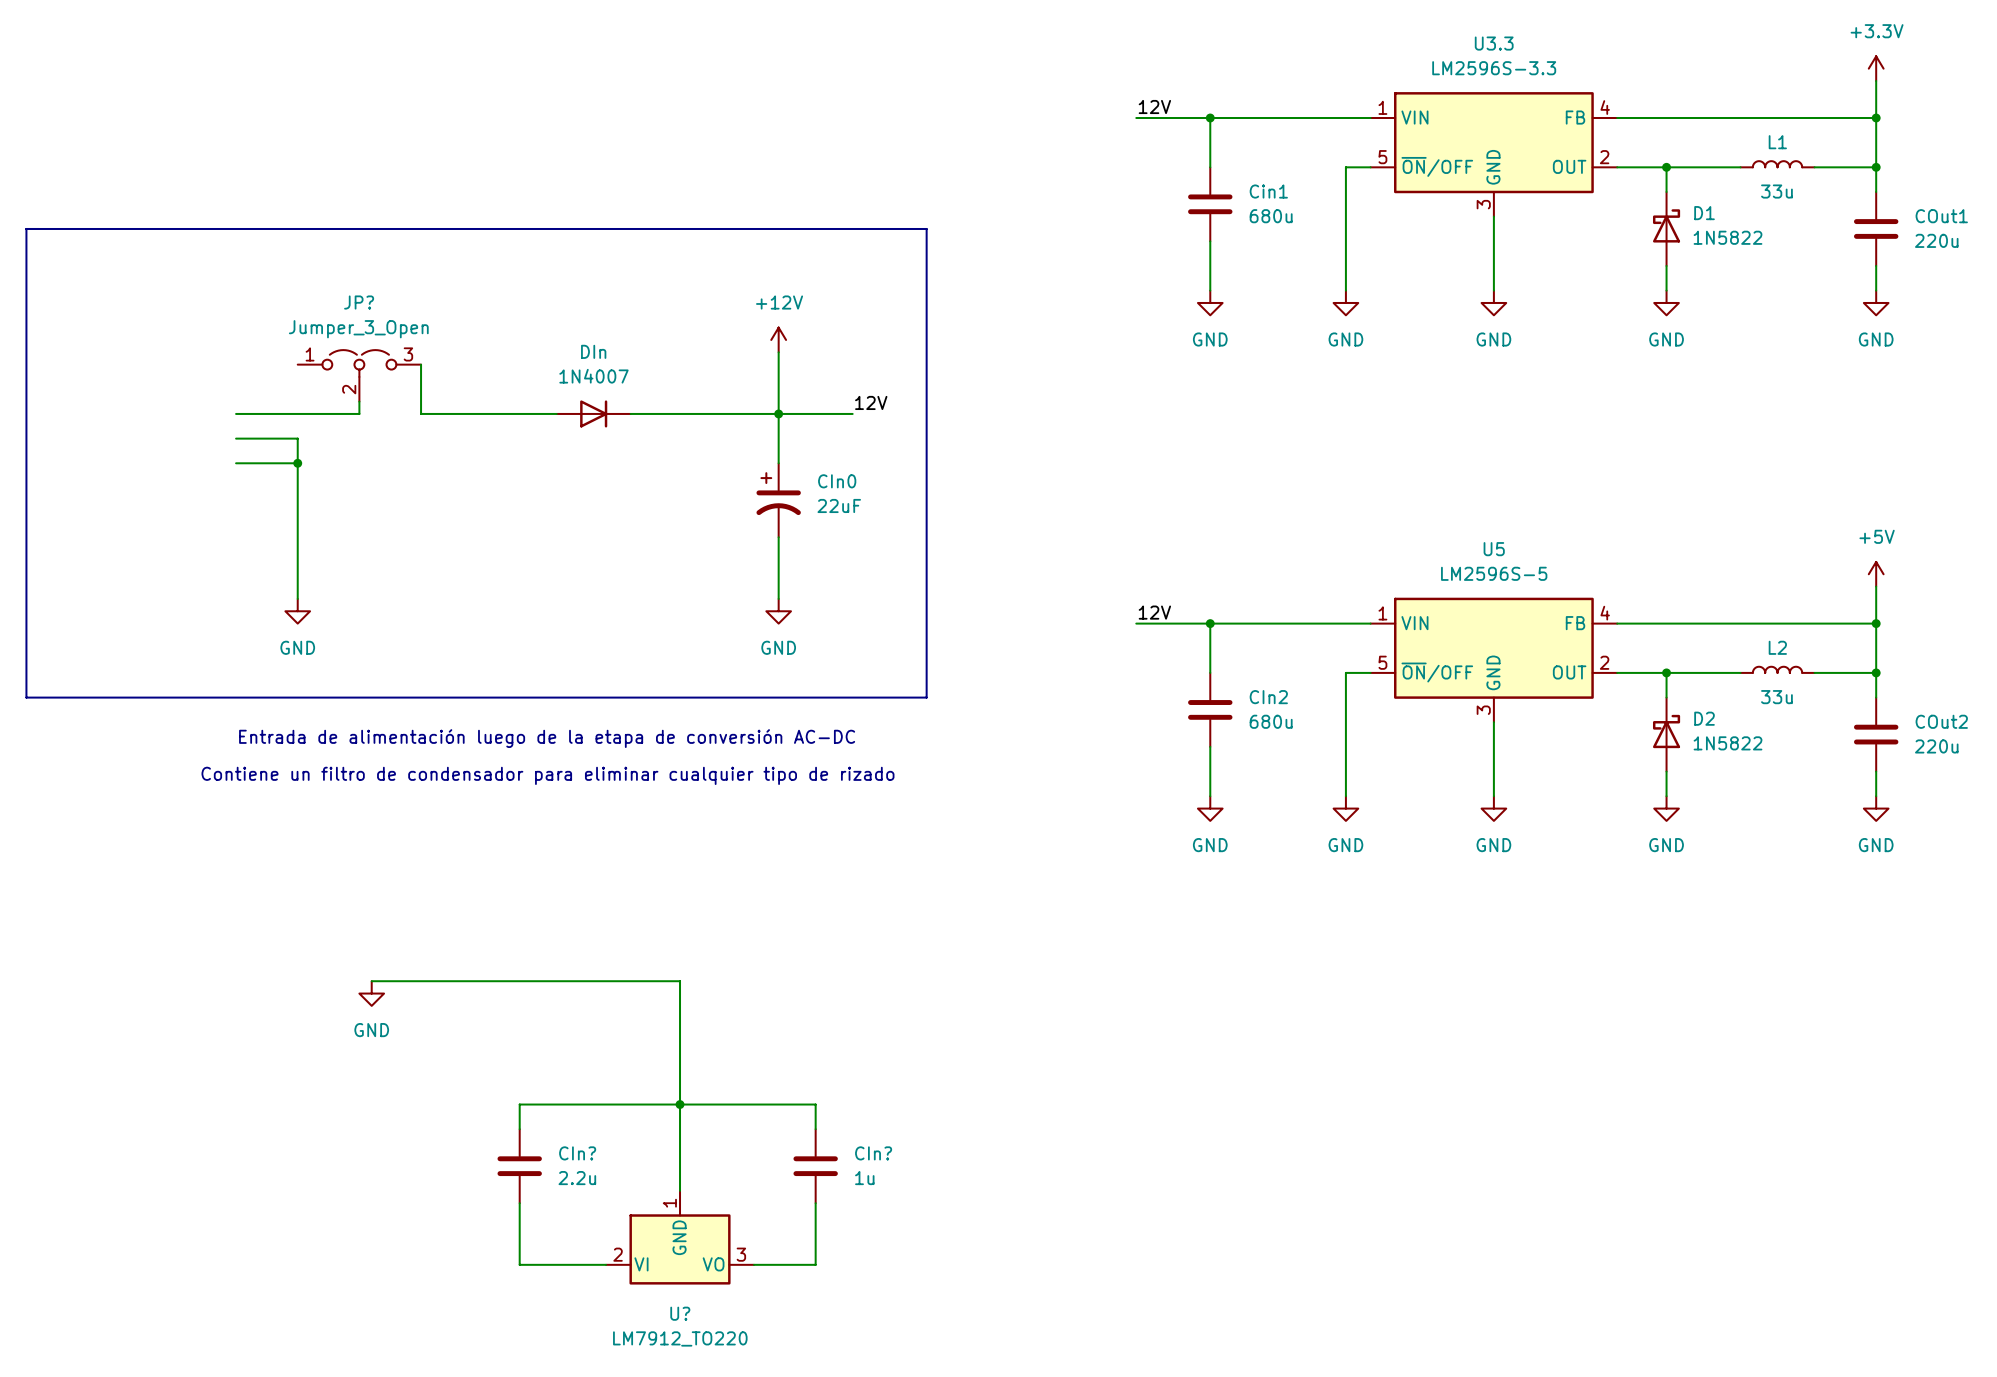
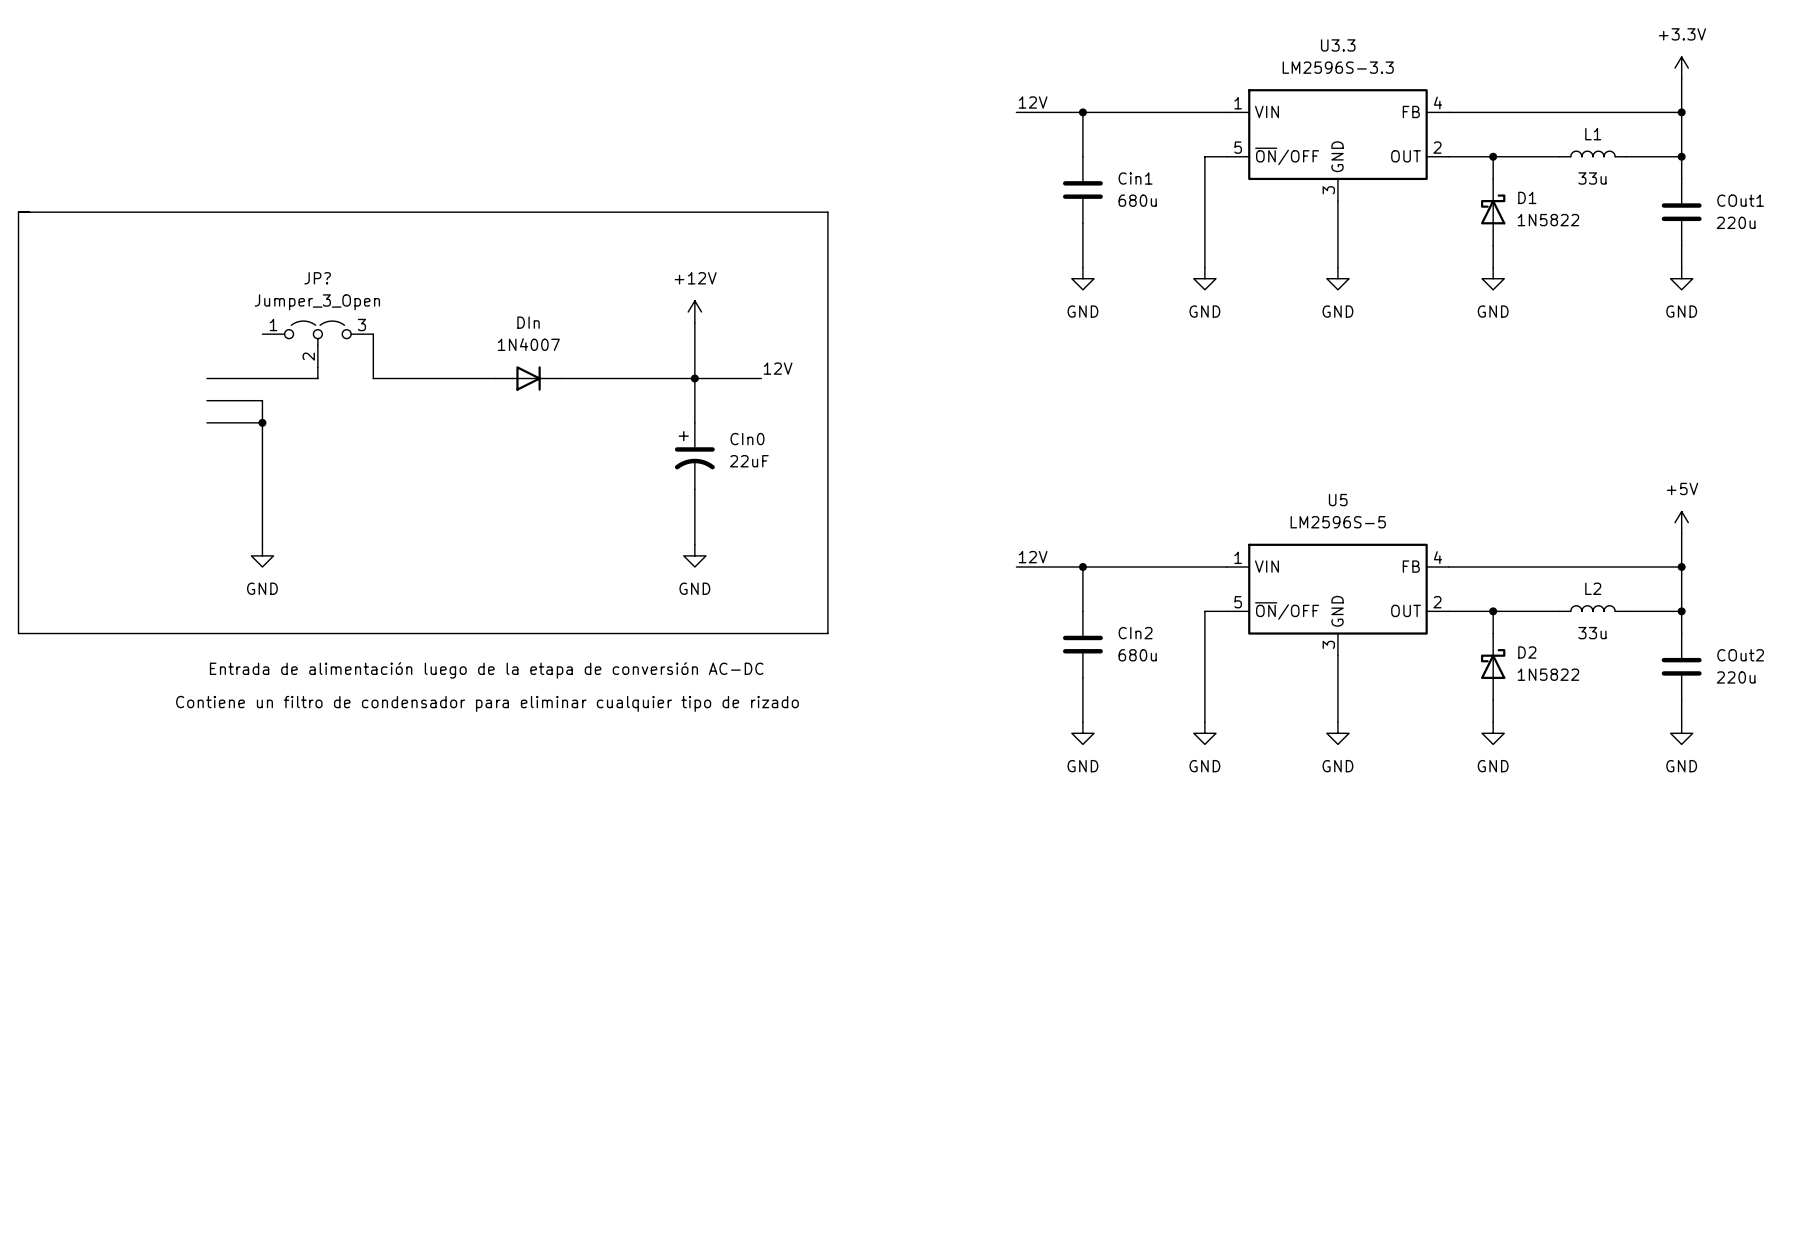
wire: (371, 981) (680, 981) (680, 1190) -> none
power symbol: GND (371, 993) -> none
junction: (680, 1104) -> none
wire: (519, 1129) (519, 1104) (815, 1104) (815, 1129) -> none
CIn?: 2.2u (519, 1166) -> none
CIn?: 1u (815, 1166) -> none
wire: (519, 1203) (519, 1264) (606, 1264) -> none
wire: (815, 1203) (815, 1264) (754, 1264) -> none
U?: LM7912_TO220 (680, 1237) -> none

